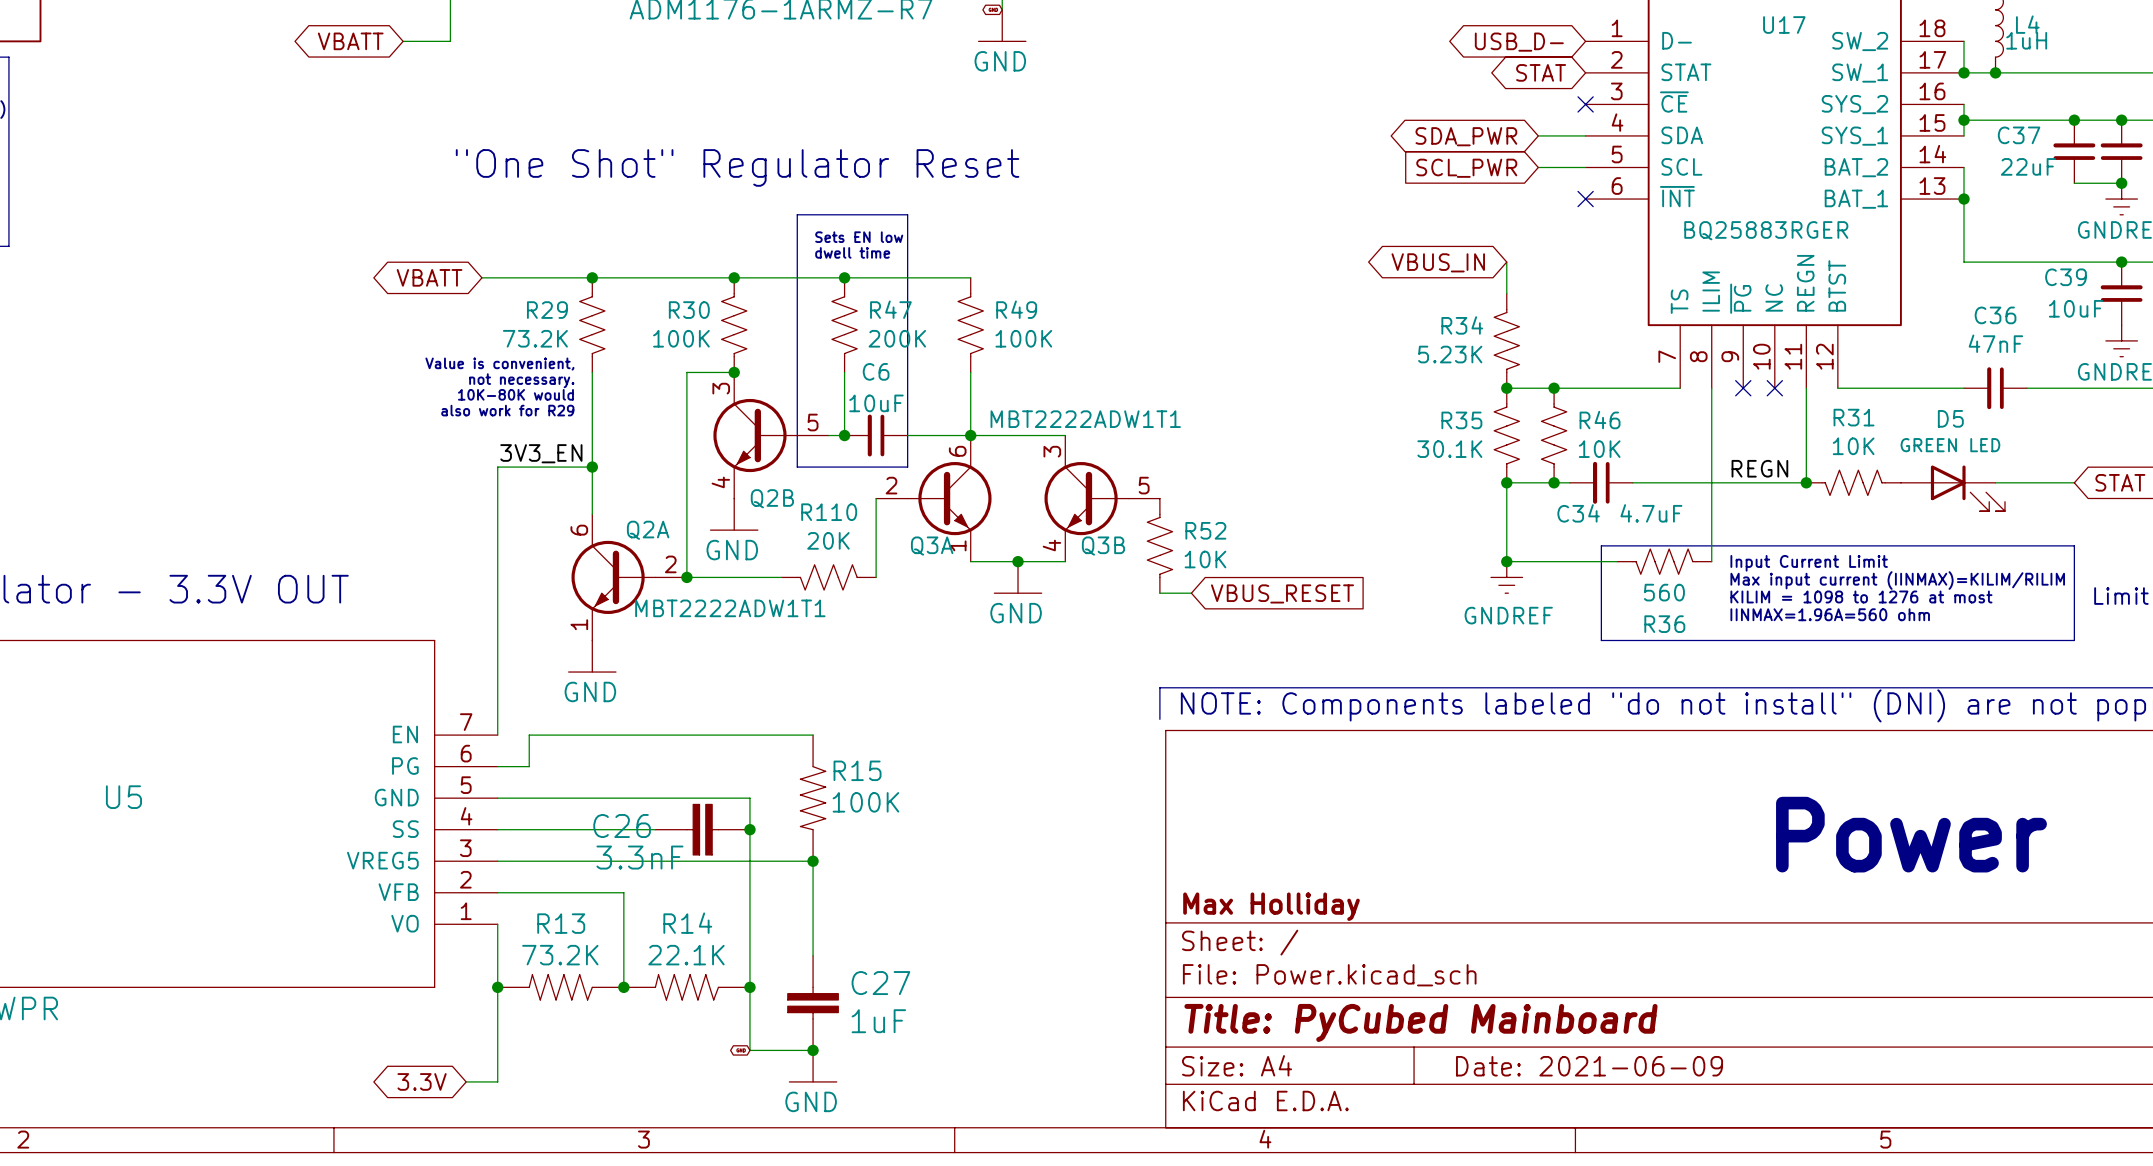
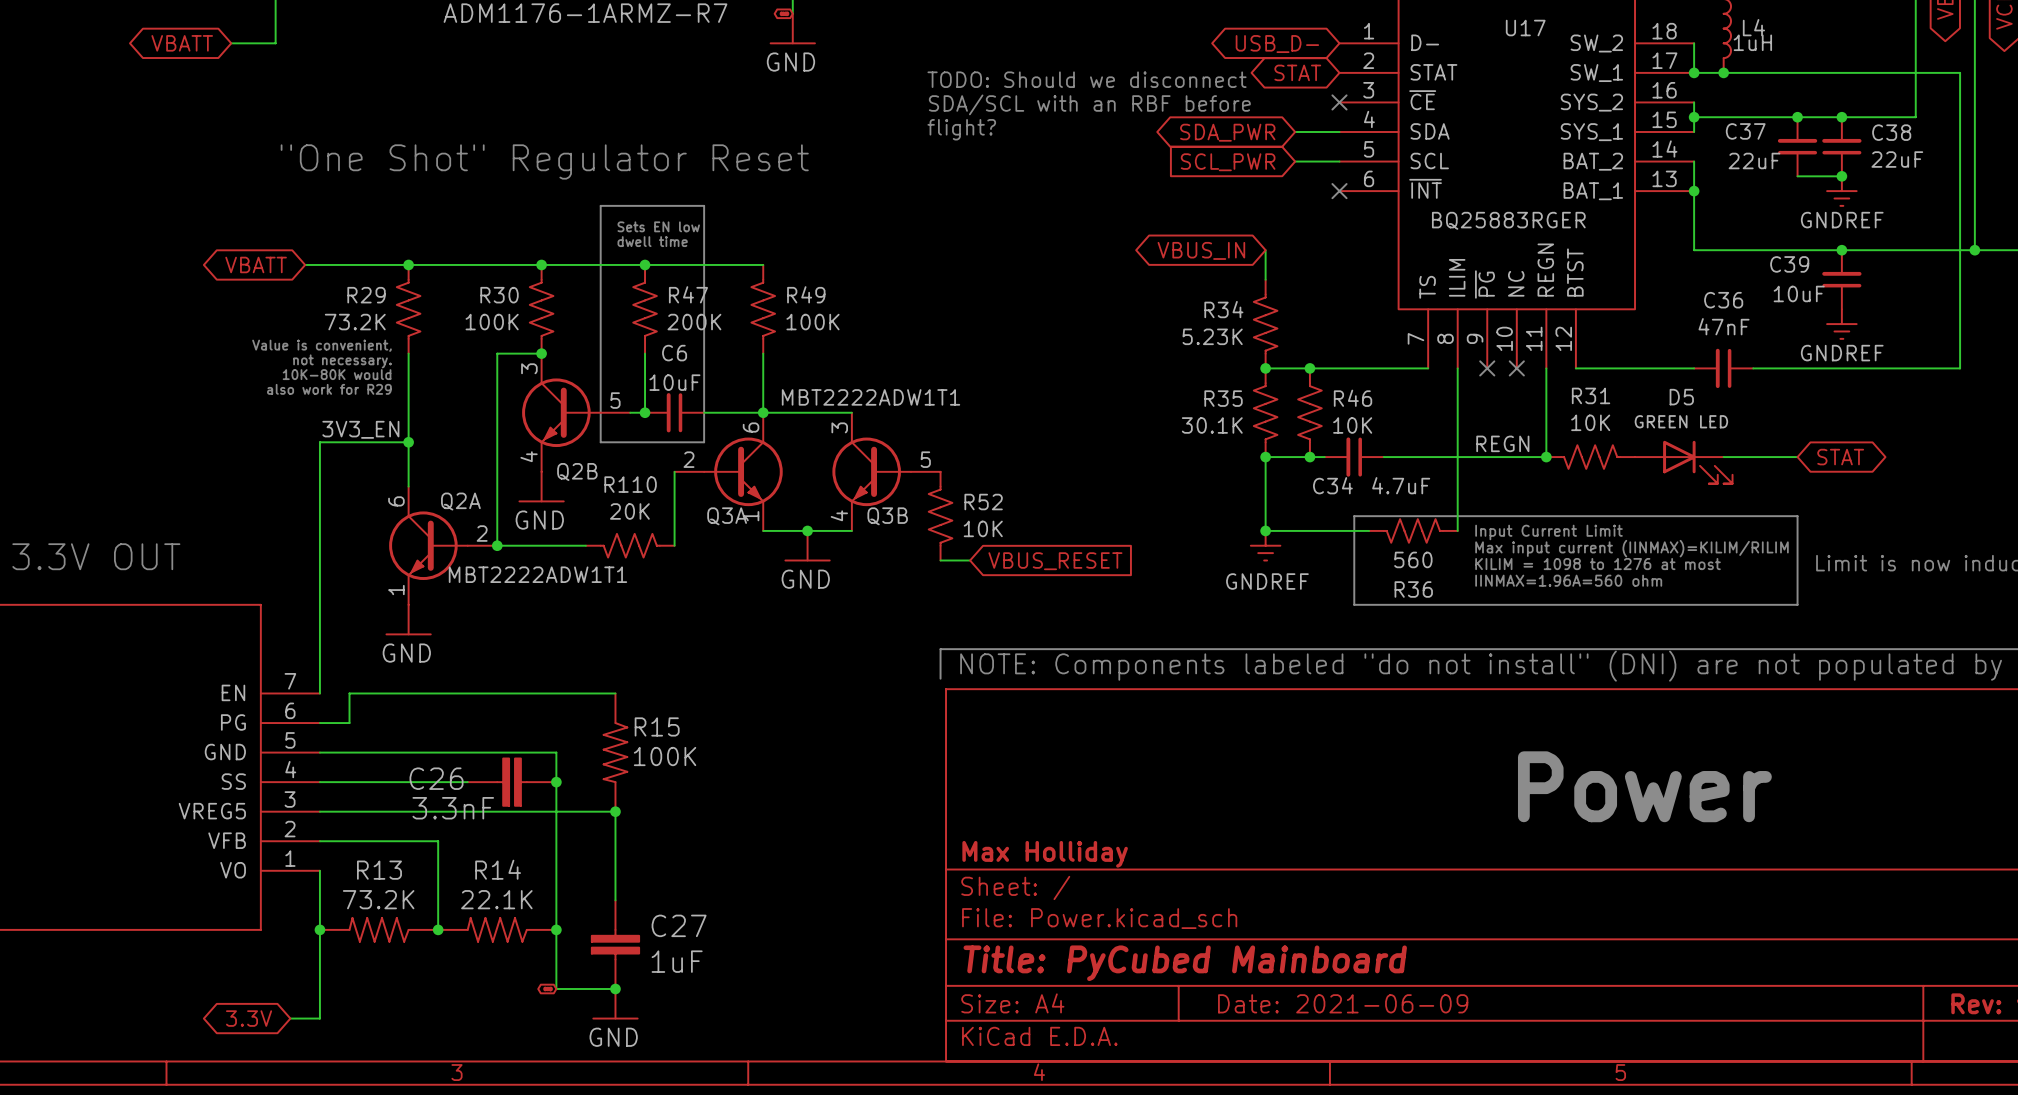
text: none -> TODO: Should we disconnect (1087, 79)
text: none -> SDA/SCL with an RBF before (1089, 104)
text: none -> flight? (961, 129)

